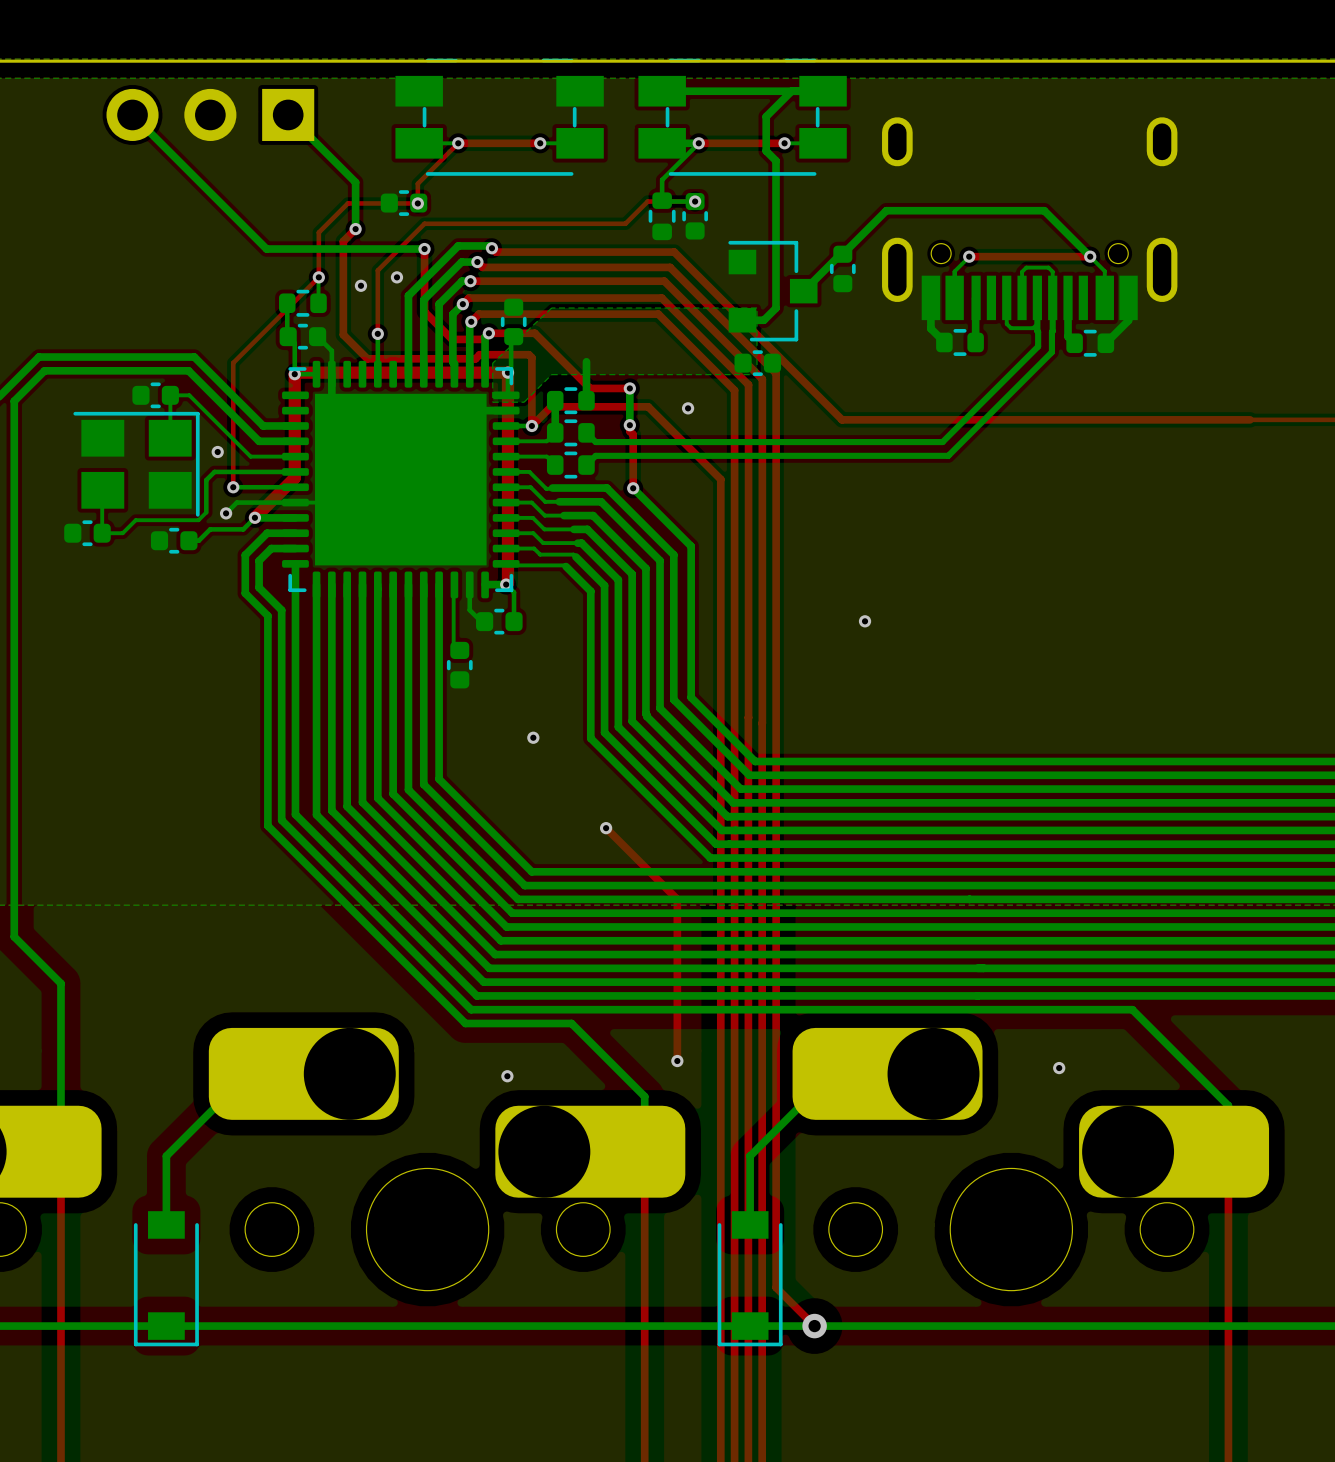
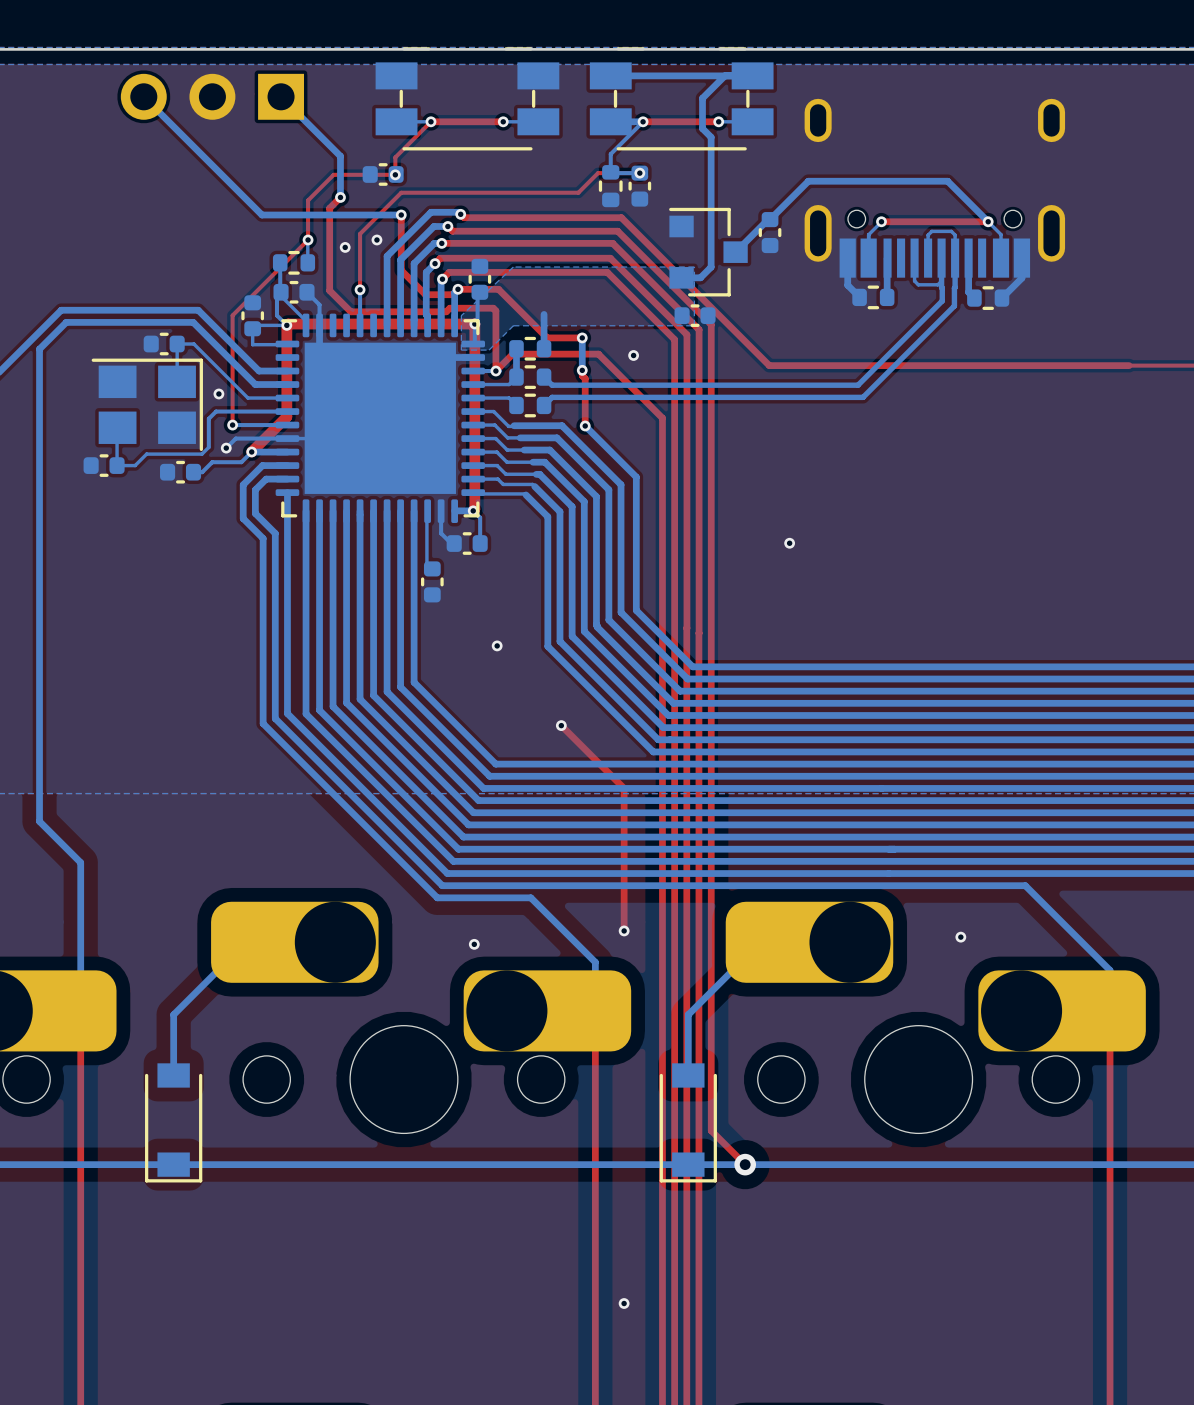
bottom track: (288, 336) (294, 343) (294, 374) (316, 374) -> (287, 344) (252, 344) (252, 328) (256, 325) (286, 325) (276, 315) (276, 296) (281, 292) (281, 296) (306, 321) (306, 325)
part: none -> (252, 315)

